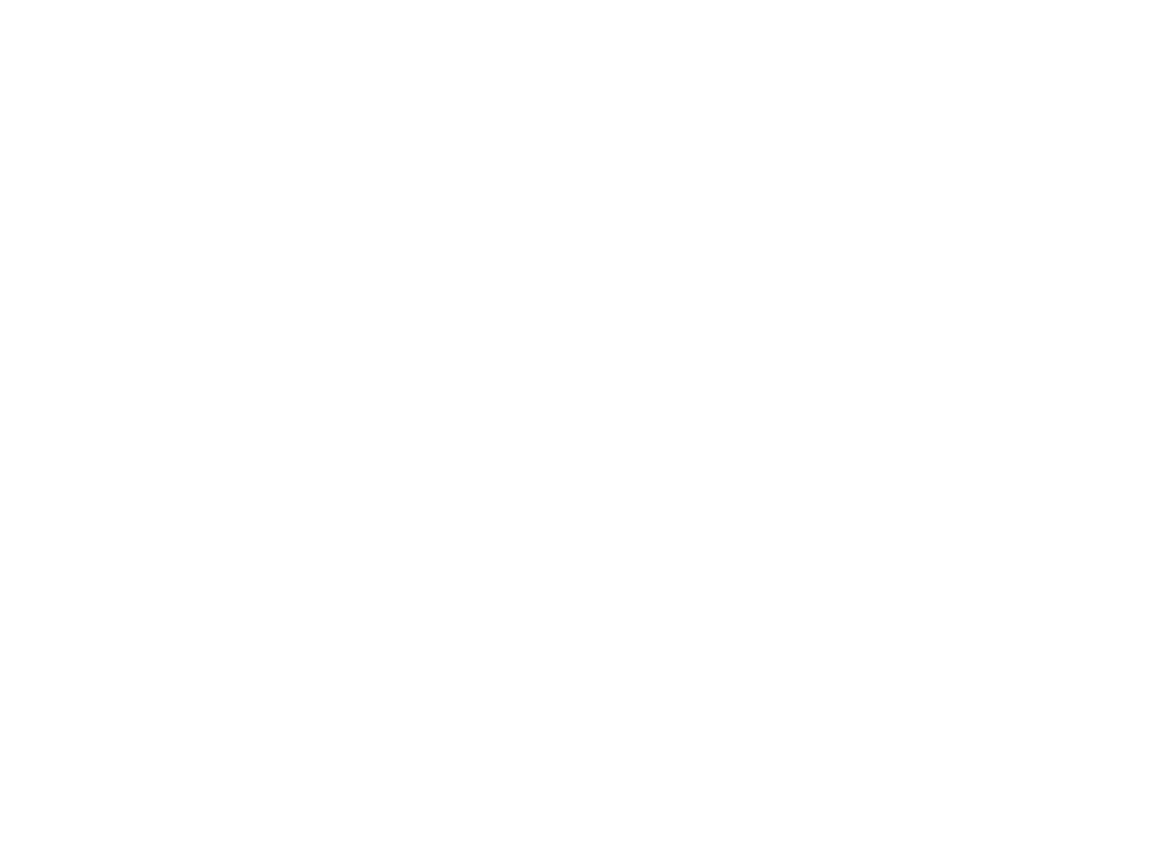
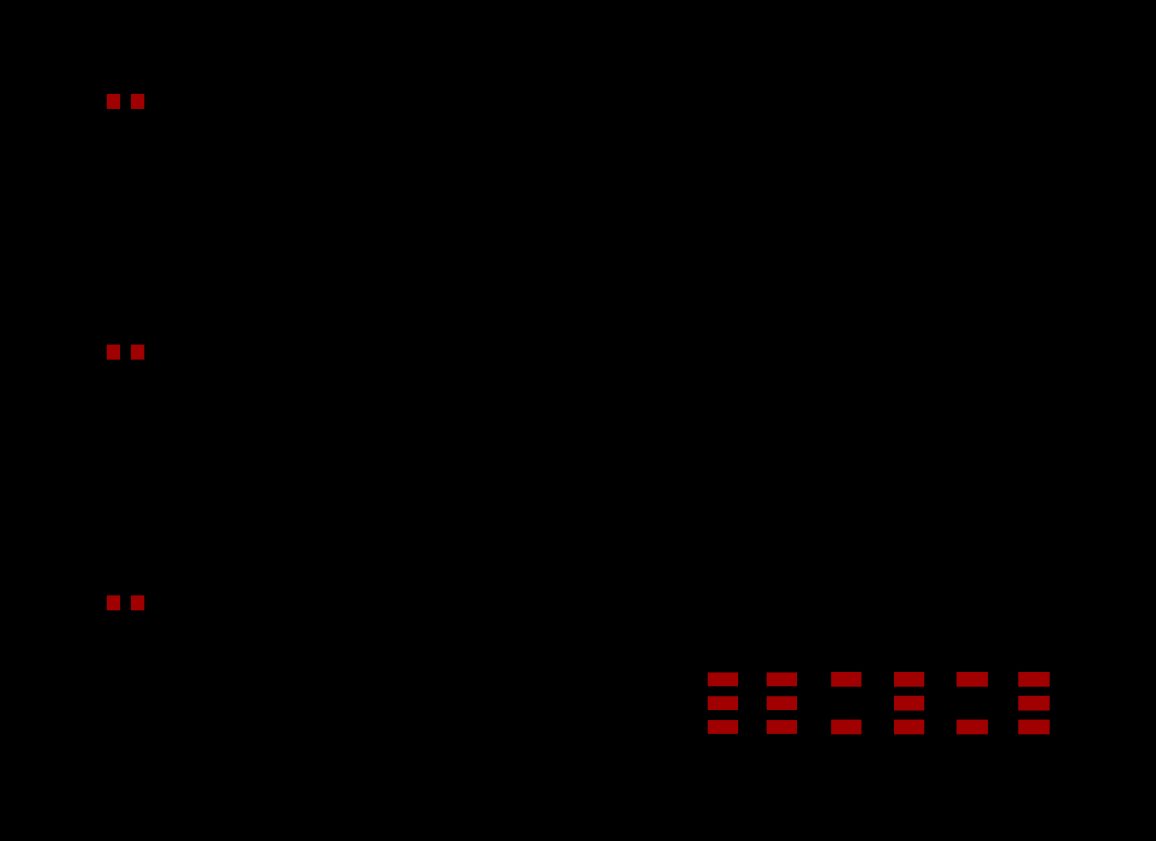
part: none -> (125, 101)
part: none -> (125, 352)
part: none -> (125, 602)
part: none -> (752, 703)
part: none -> (877, 703)
part: none -> (1003, 703)

